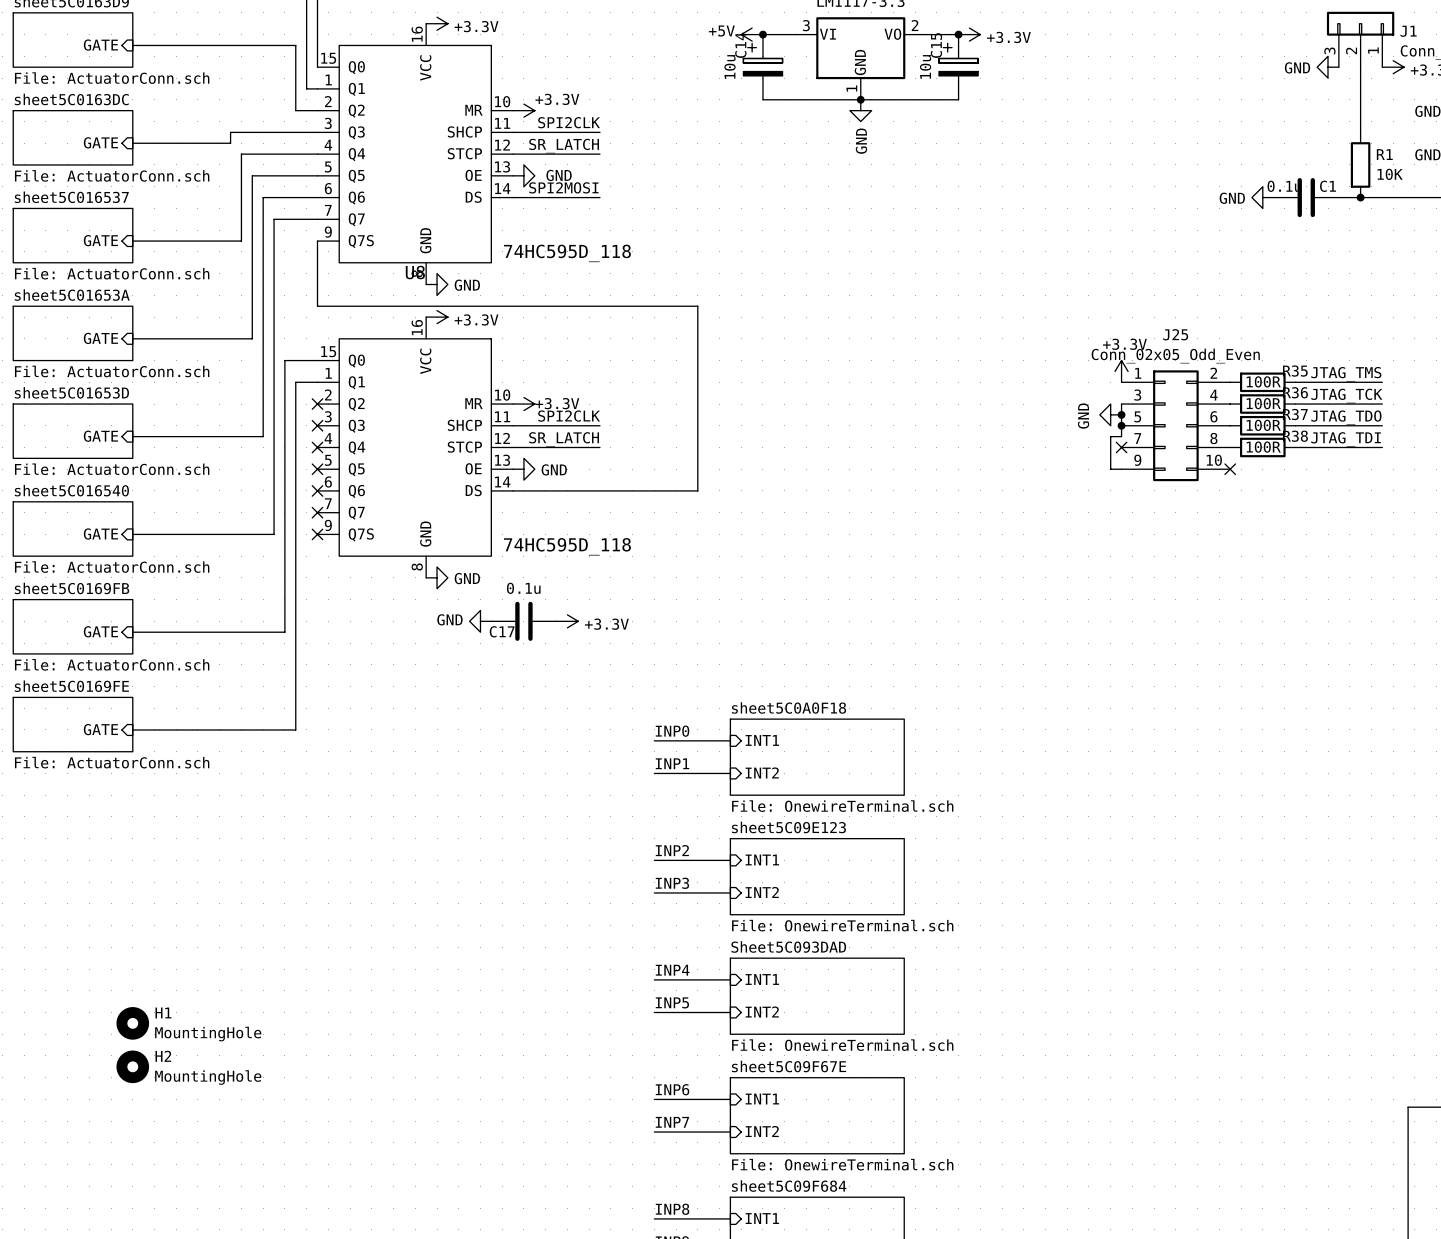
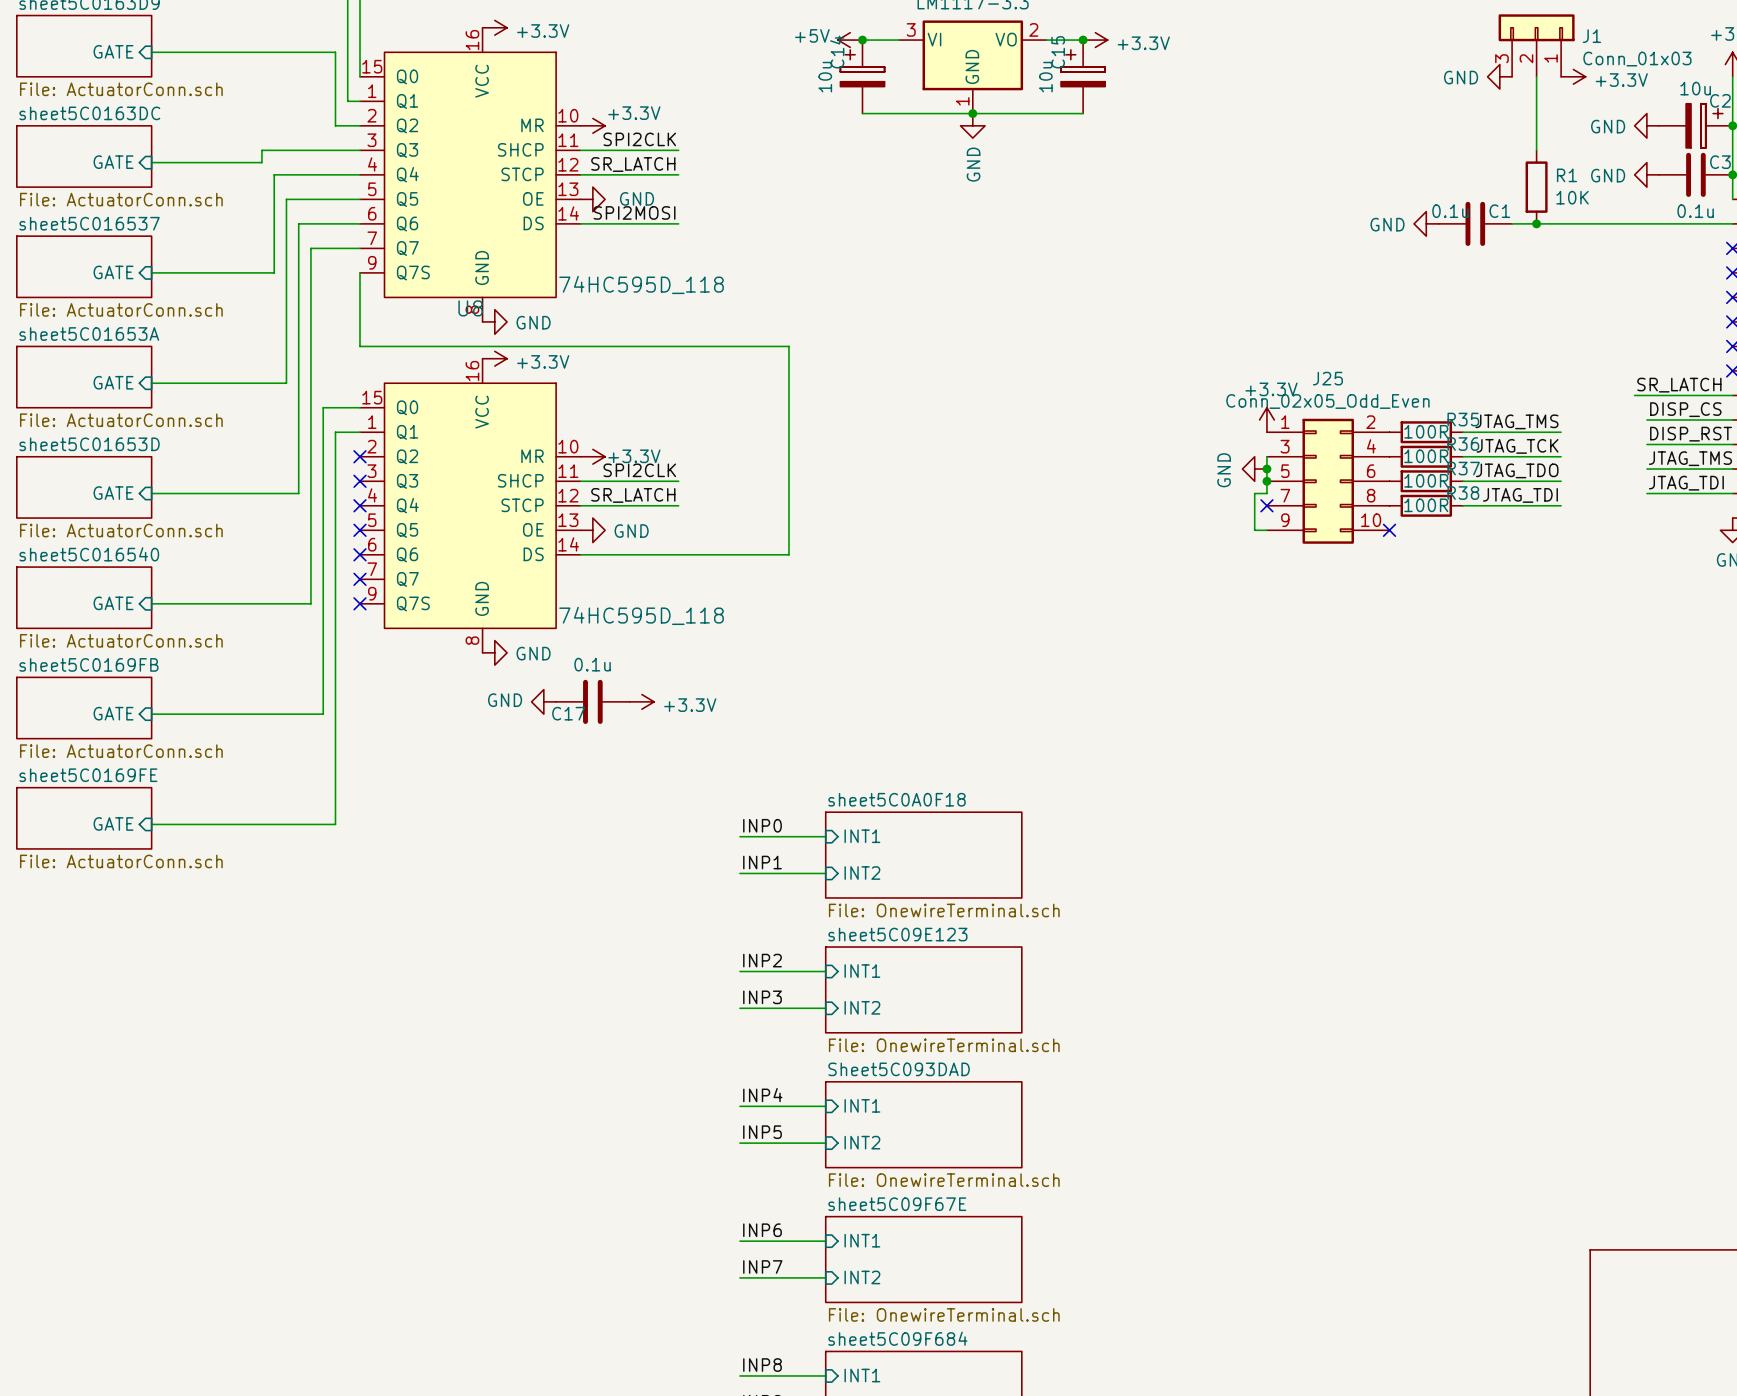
H1: MountingHole (132, 1023) -> none
H2: MountingHole (132, 1066) -> none

